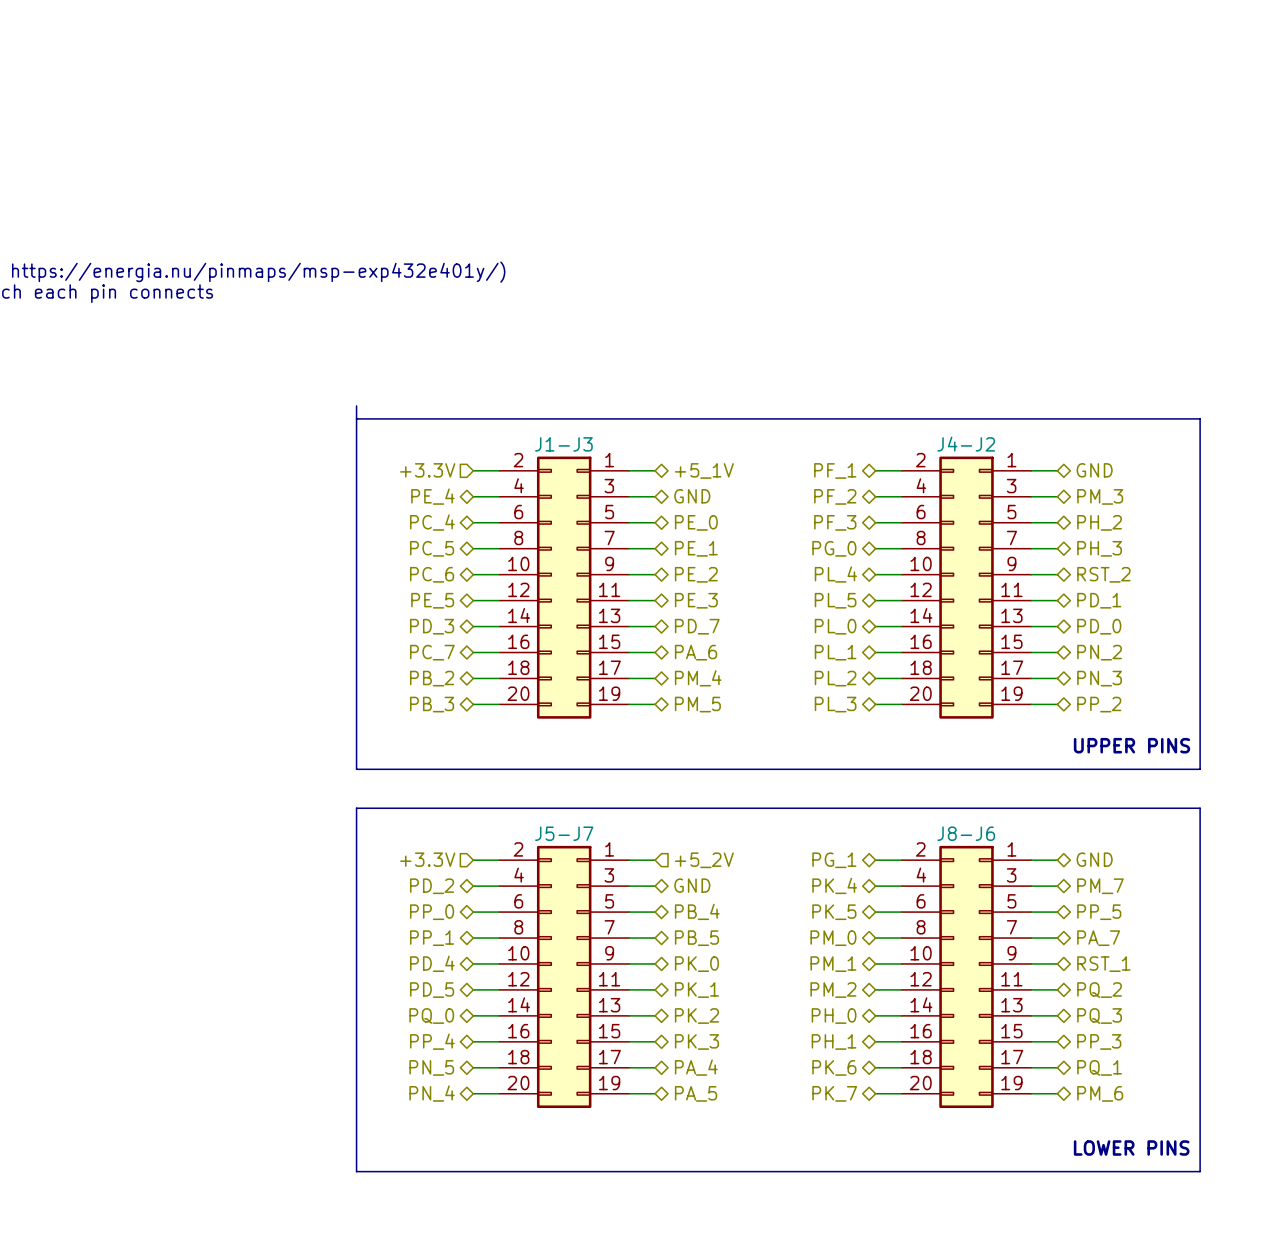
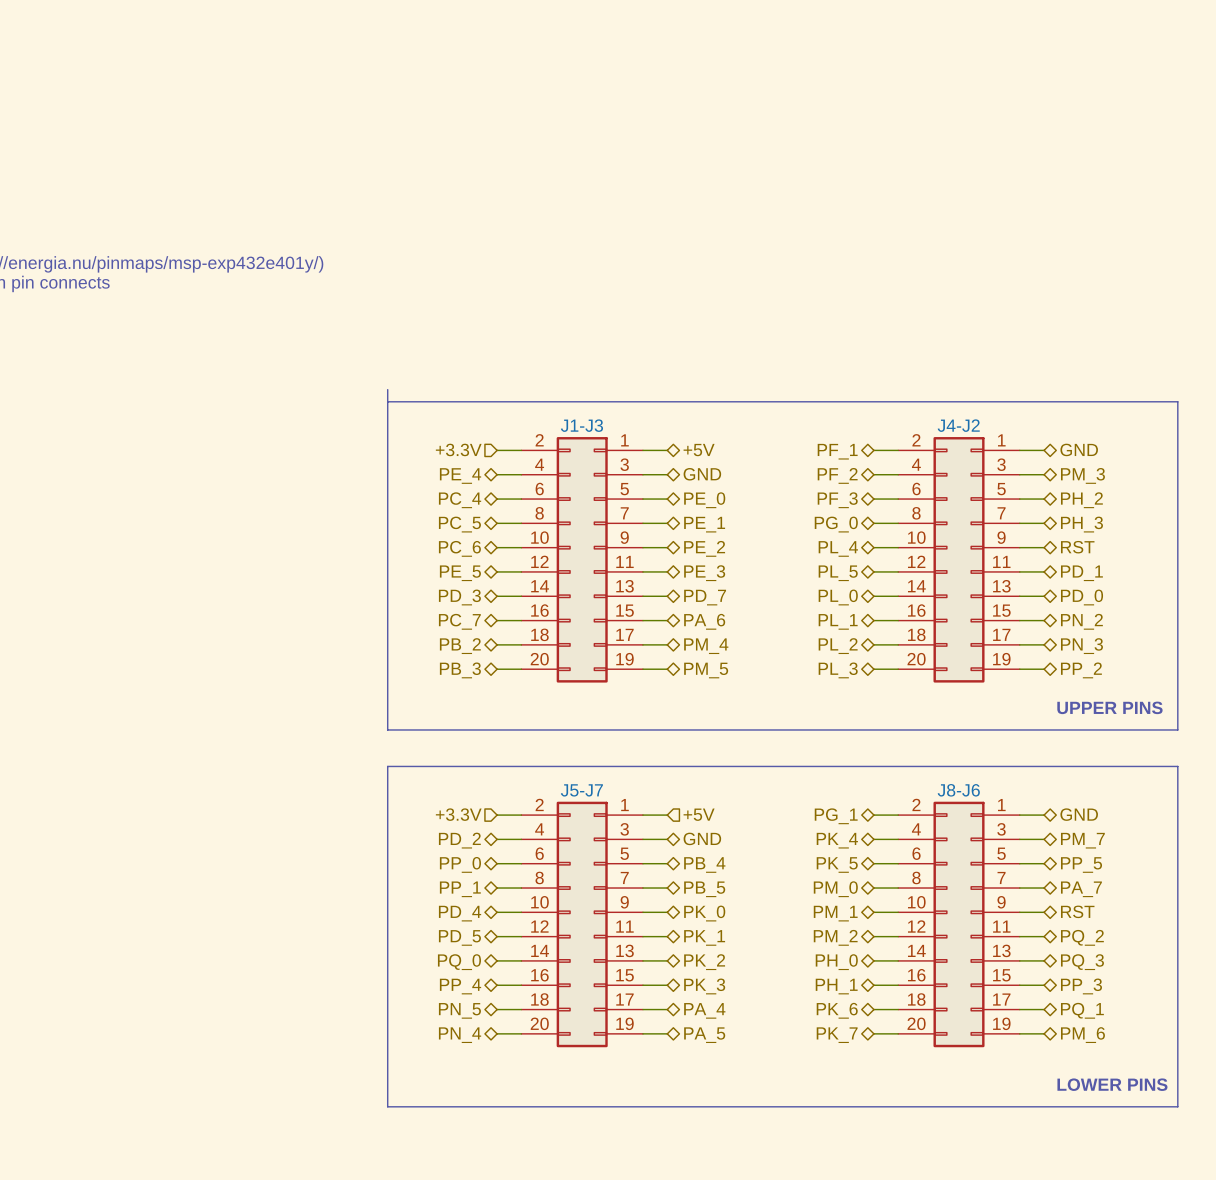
hierarchical label: +5_1V (704, 470) -> +5V (699, 450)
hierarchical label: RST_2 (1103, 574) -> RST (1077, 547)
hierarchical label: +5_2V (704, 860) -> +5V (699, 814)
hierarchical label: RST_1 (1103, 964) -> RST (1077, 911)

